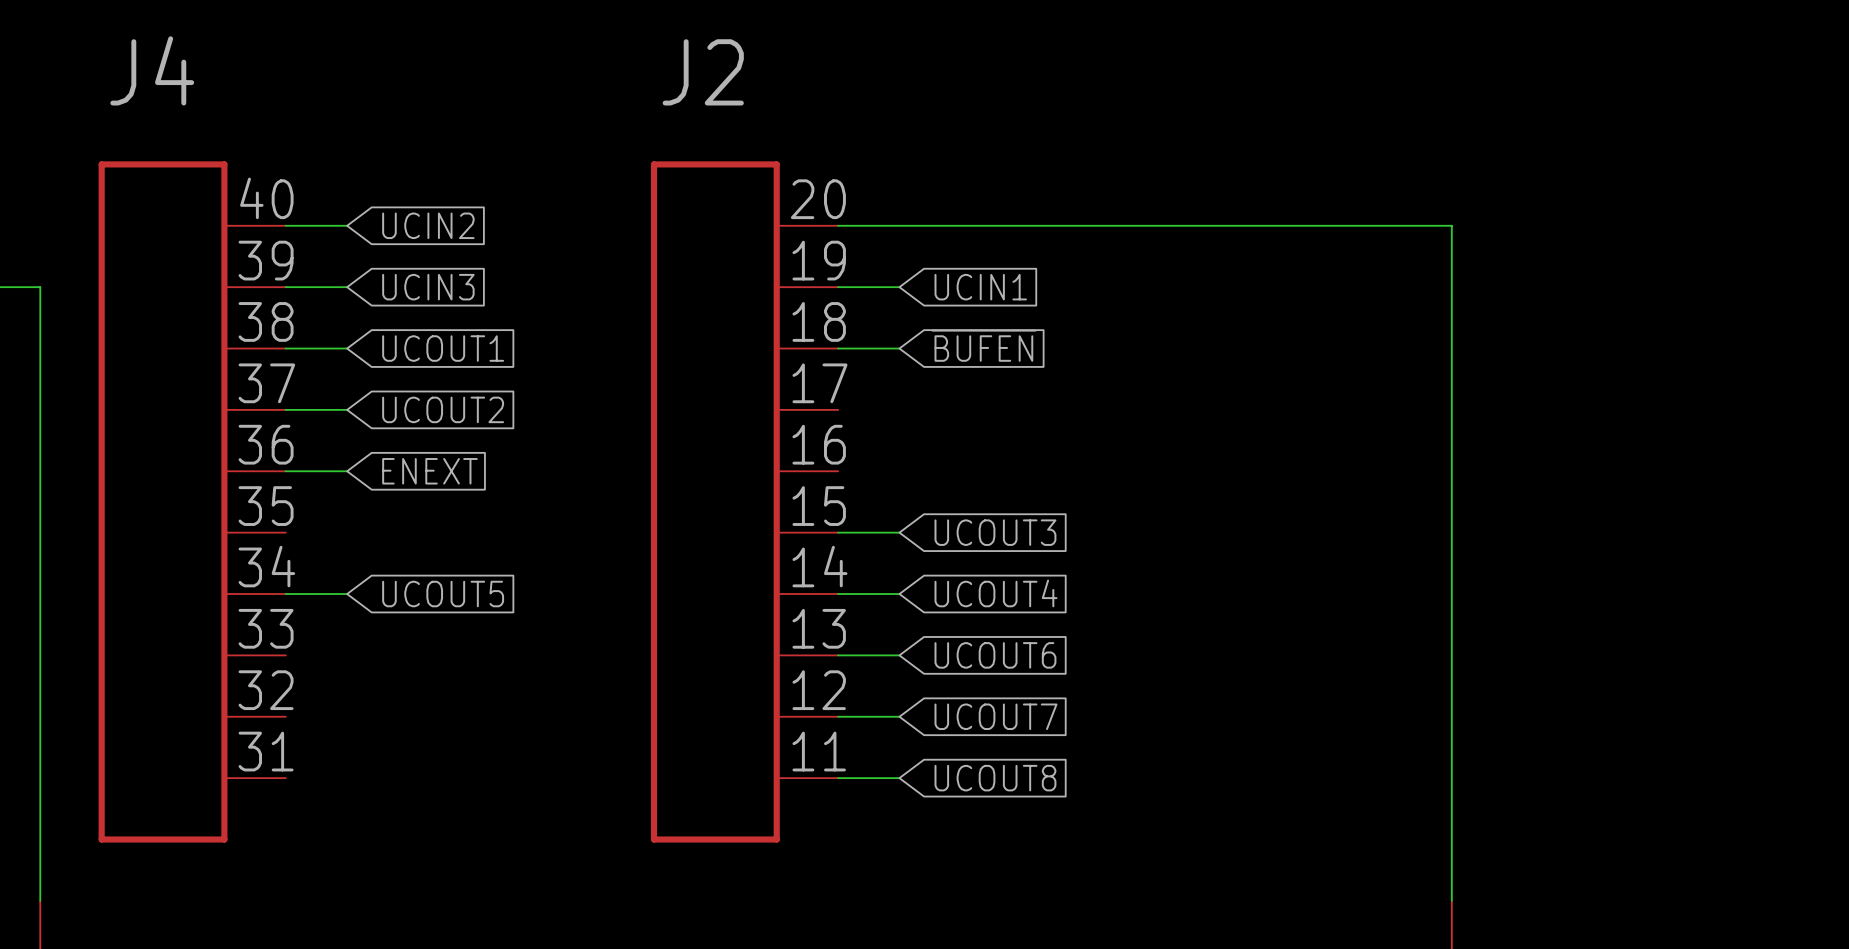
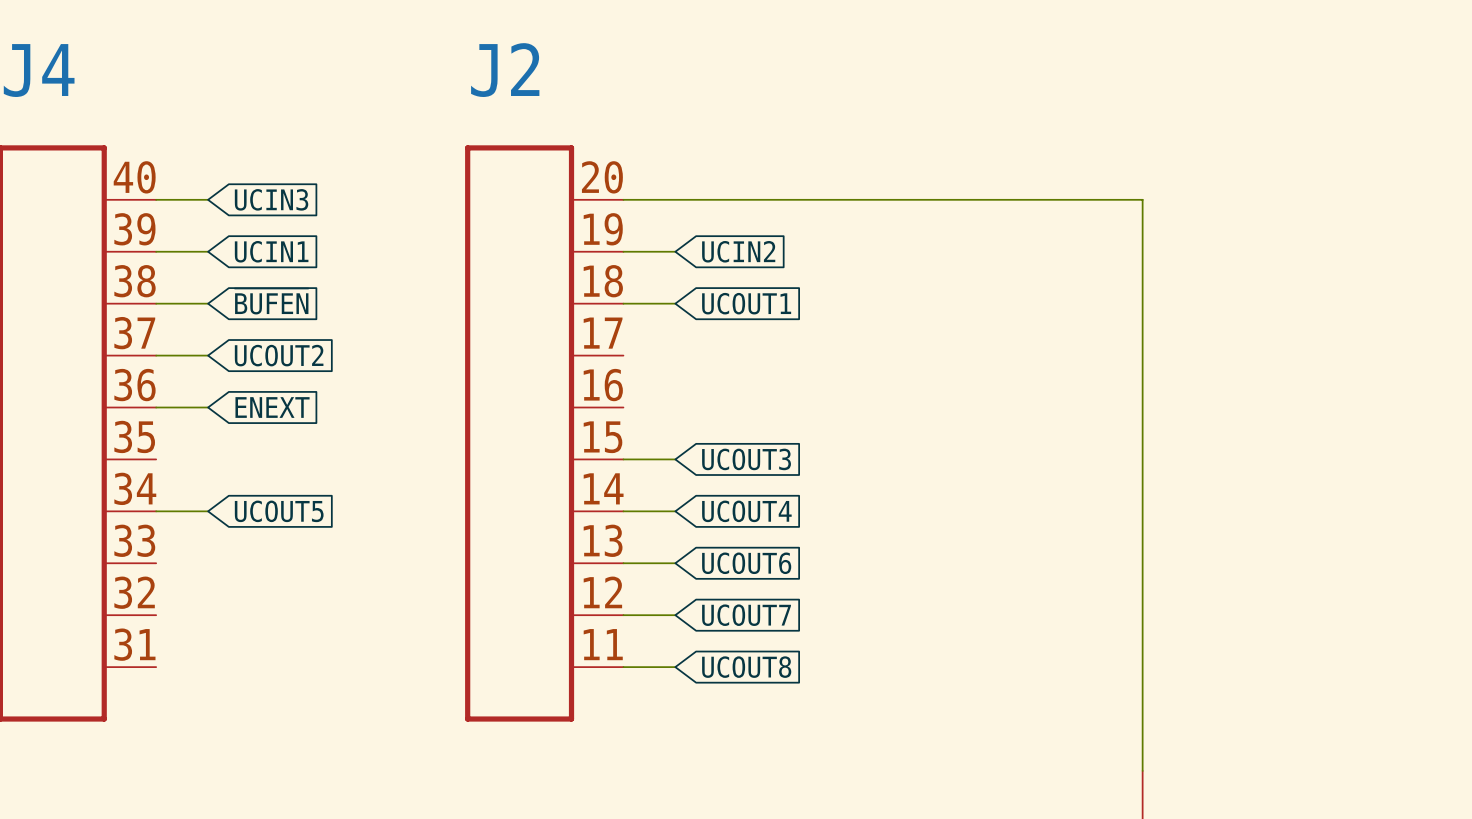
global label: UCIN2 (428, 225) -> UCIN3 (271, 199)
global label: UCIN3 (428, 287) -> UCIN1 (271, 251)
global label: UCIN1 (980, 287) -> UCIN2 (738, 251)
global label: ~{BUFEN} (983, 345) -> UCOUT1 (746, 303)
global label: UCOUT1 (443, 348) -> ~{BUFEN} (271, 301)

